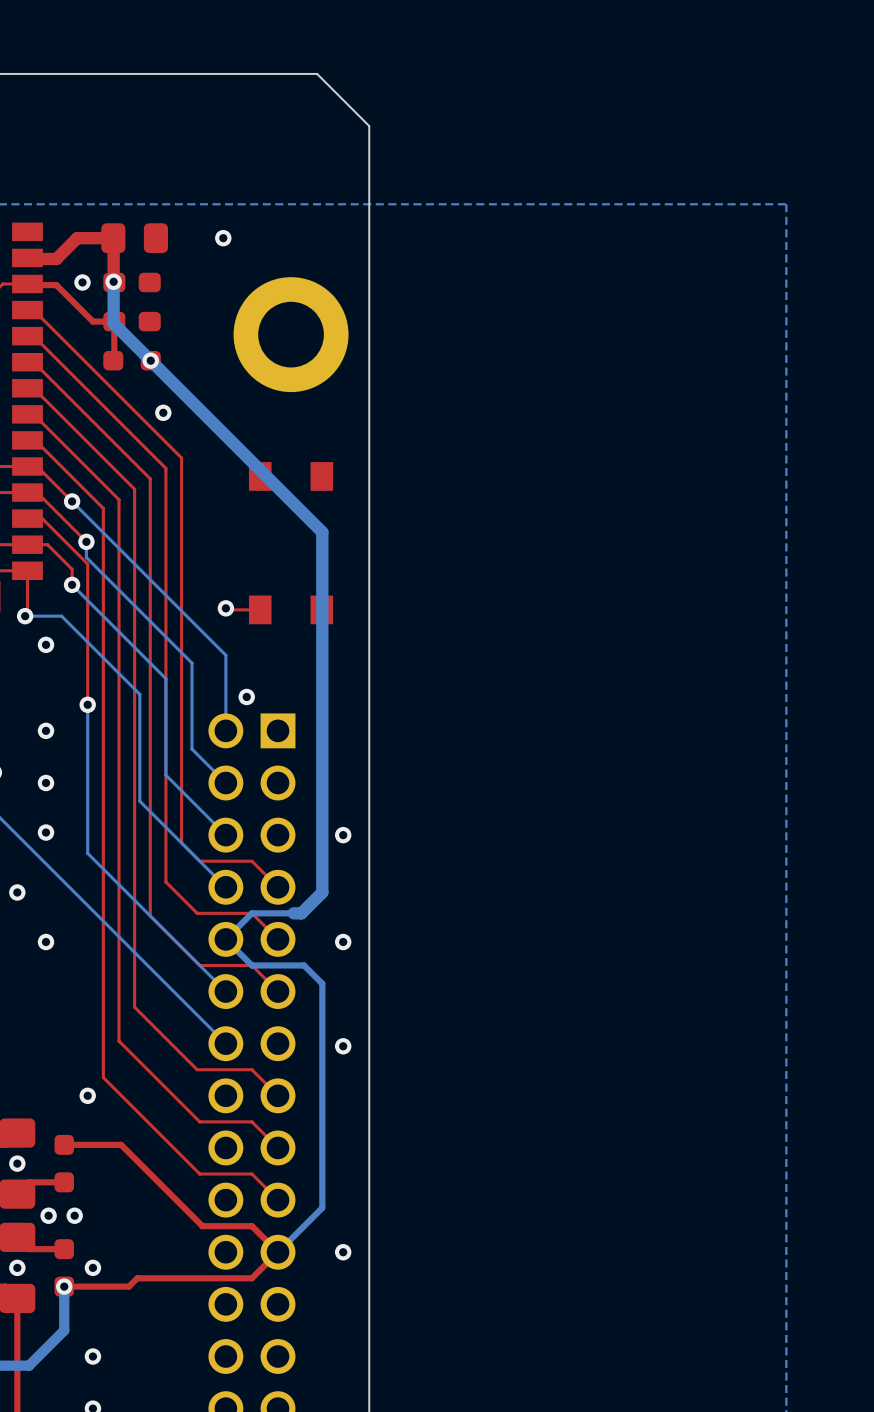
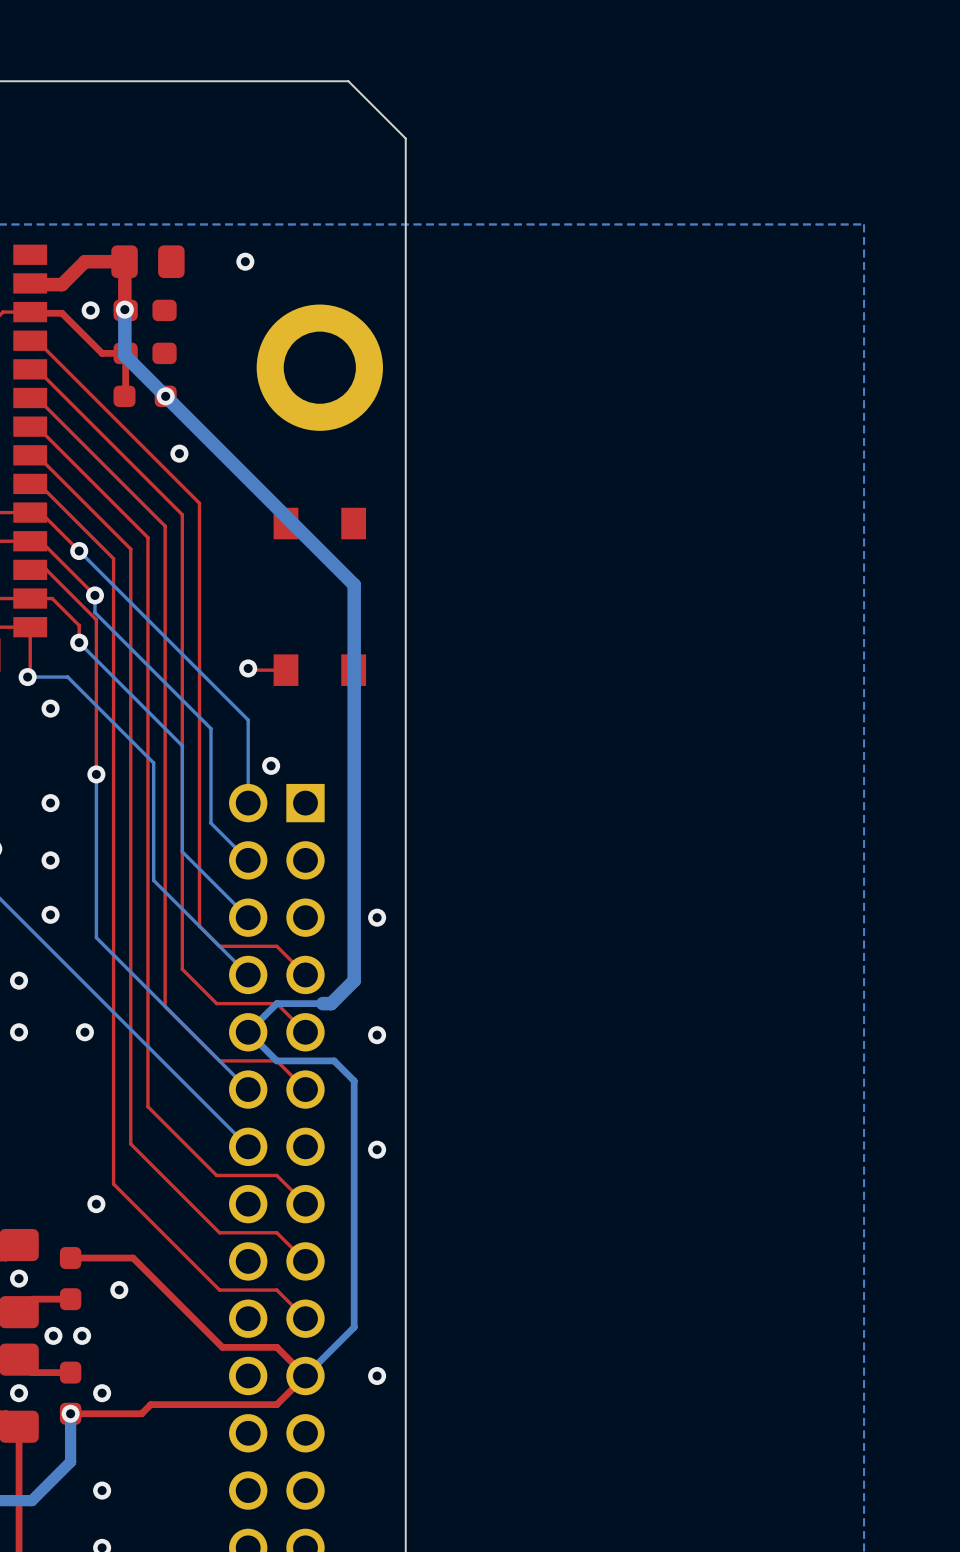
via: none -> (19, 1032)
via: none -> (84, 1032)
via: (46, 942) -> none
via: none -> (119, 1290)

